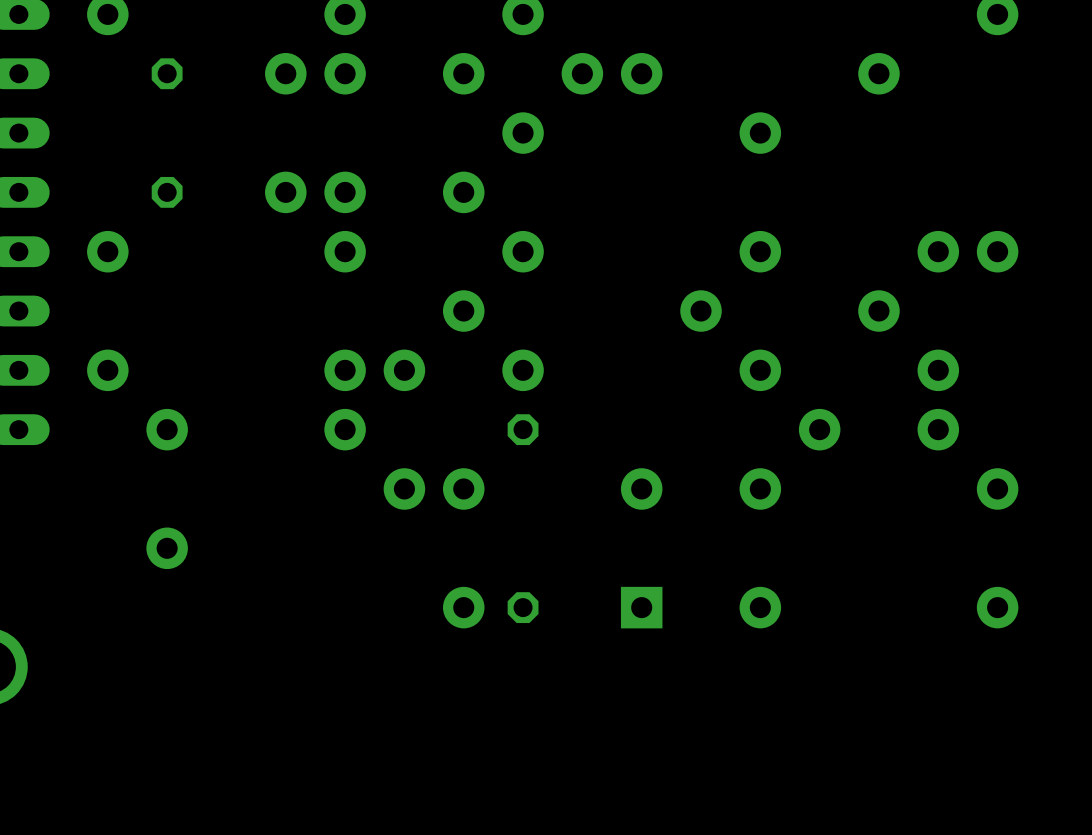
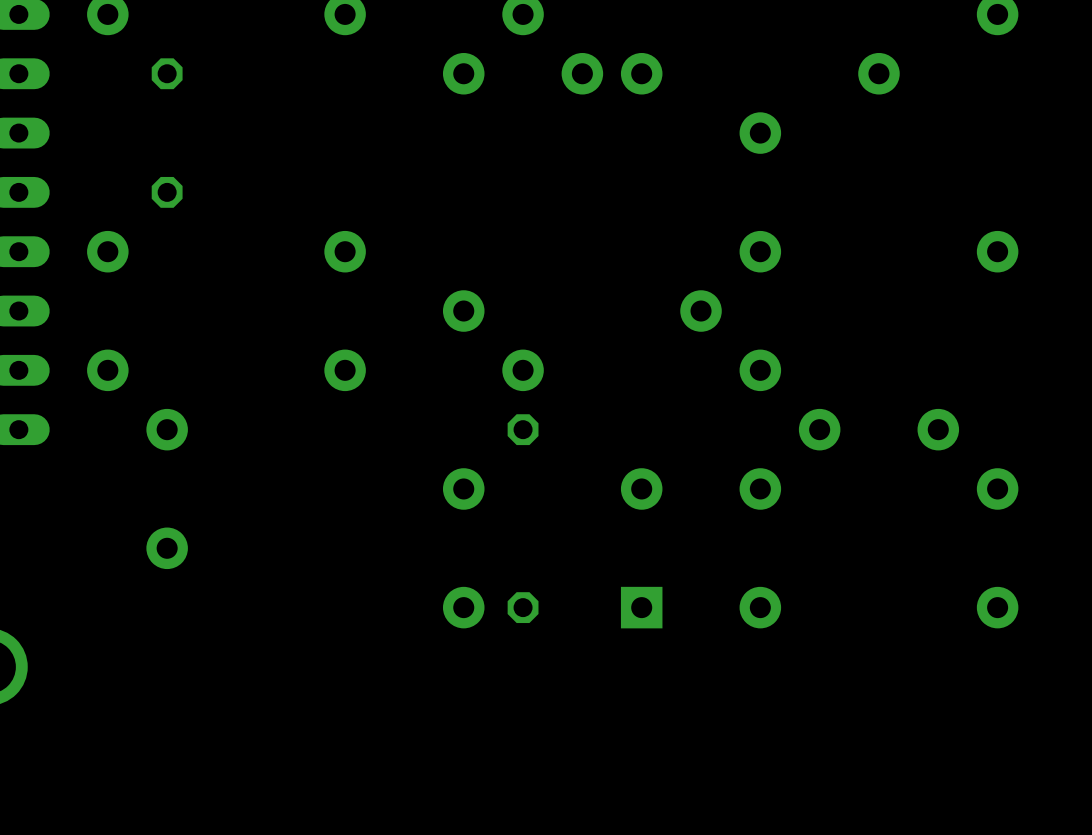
part: (315, 73) -> none
part: (315, 192) -> none
part: (493, 192) -> none
part: (908, 311) -> none
part: (374, 429) -> none

